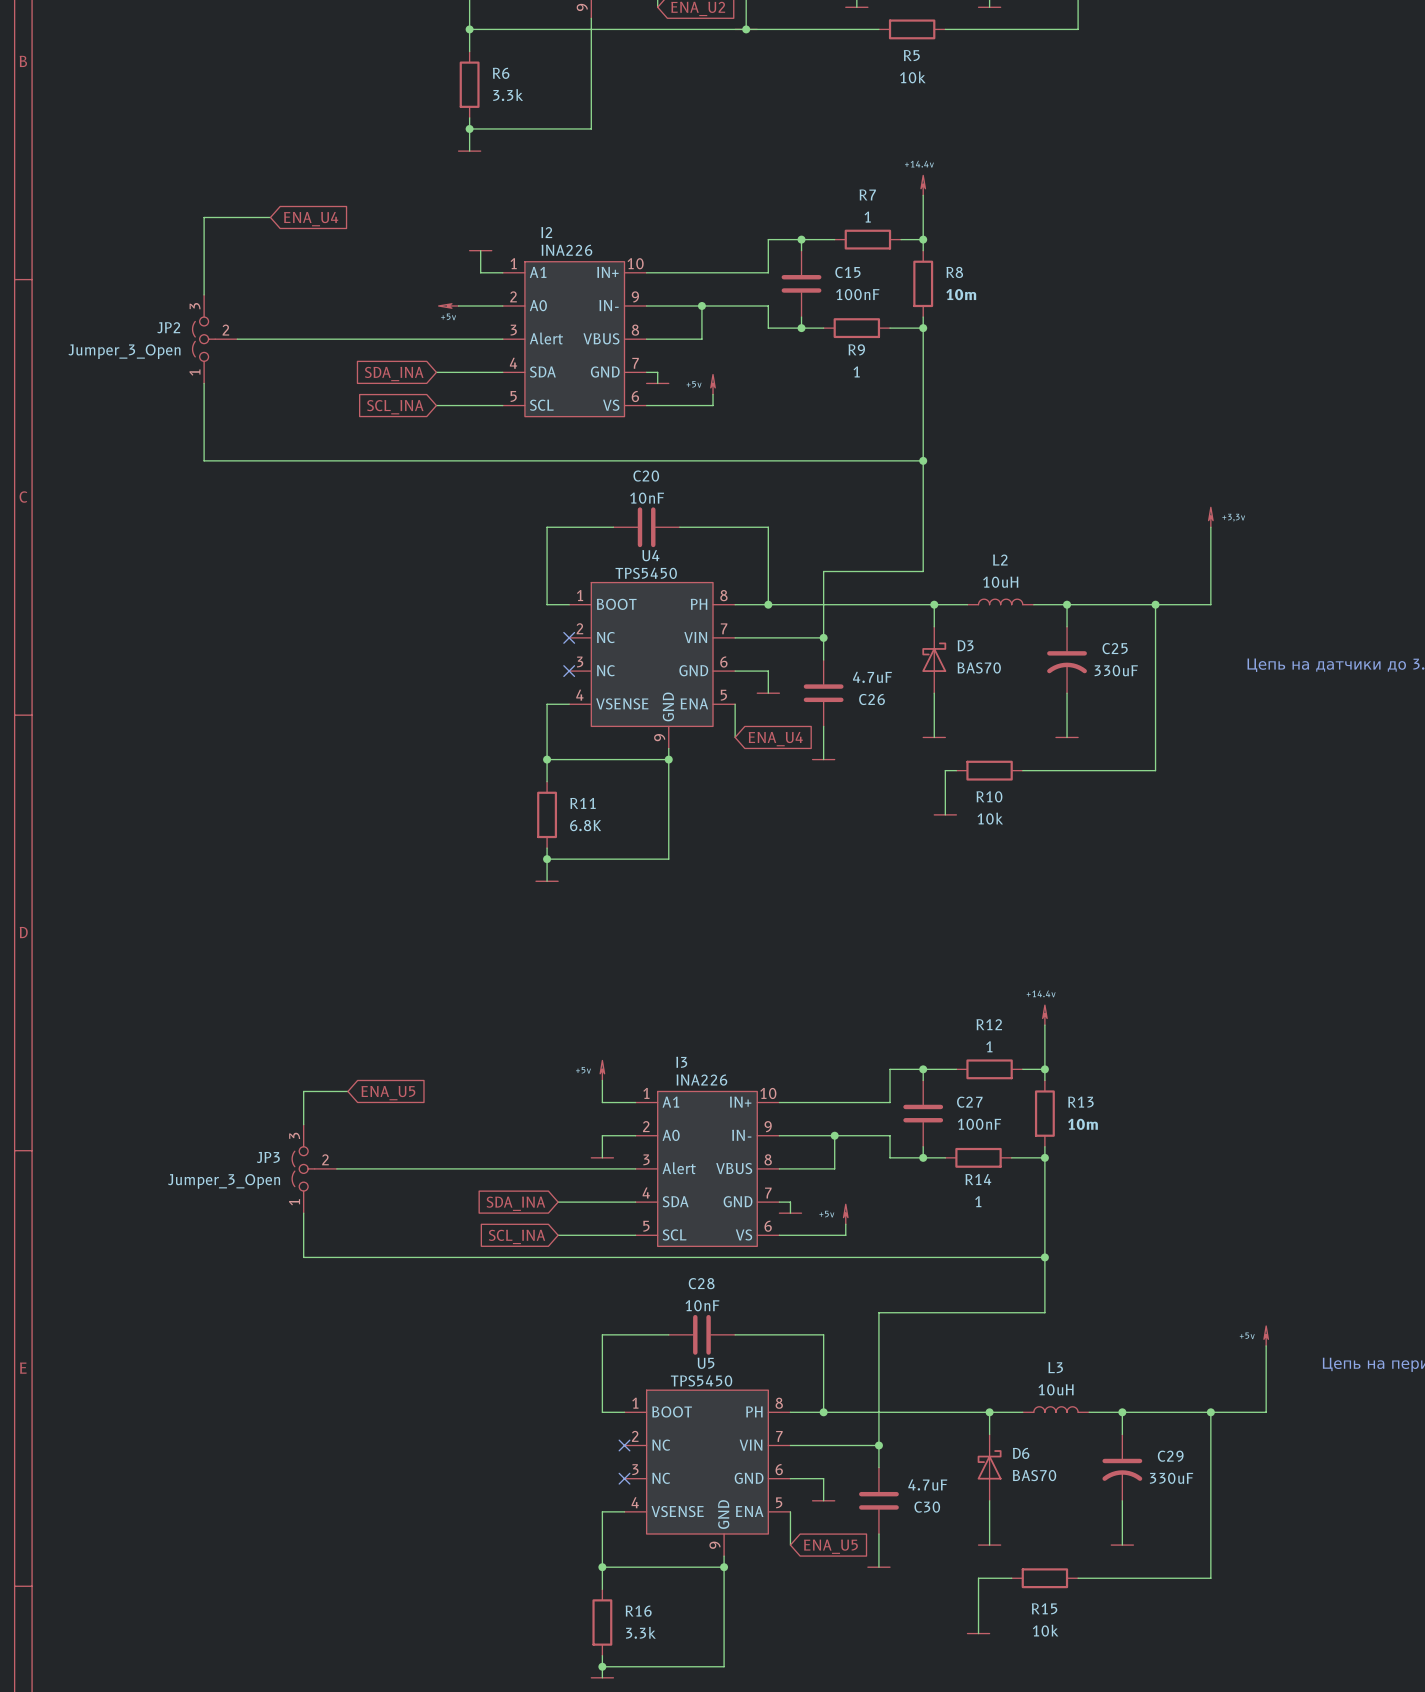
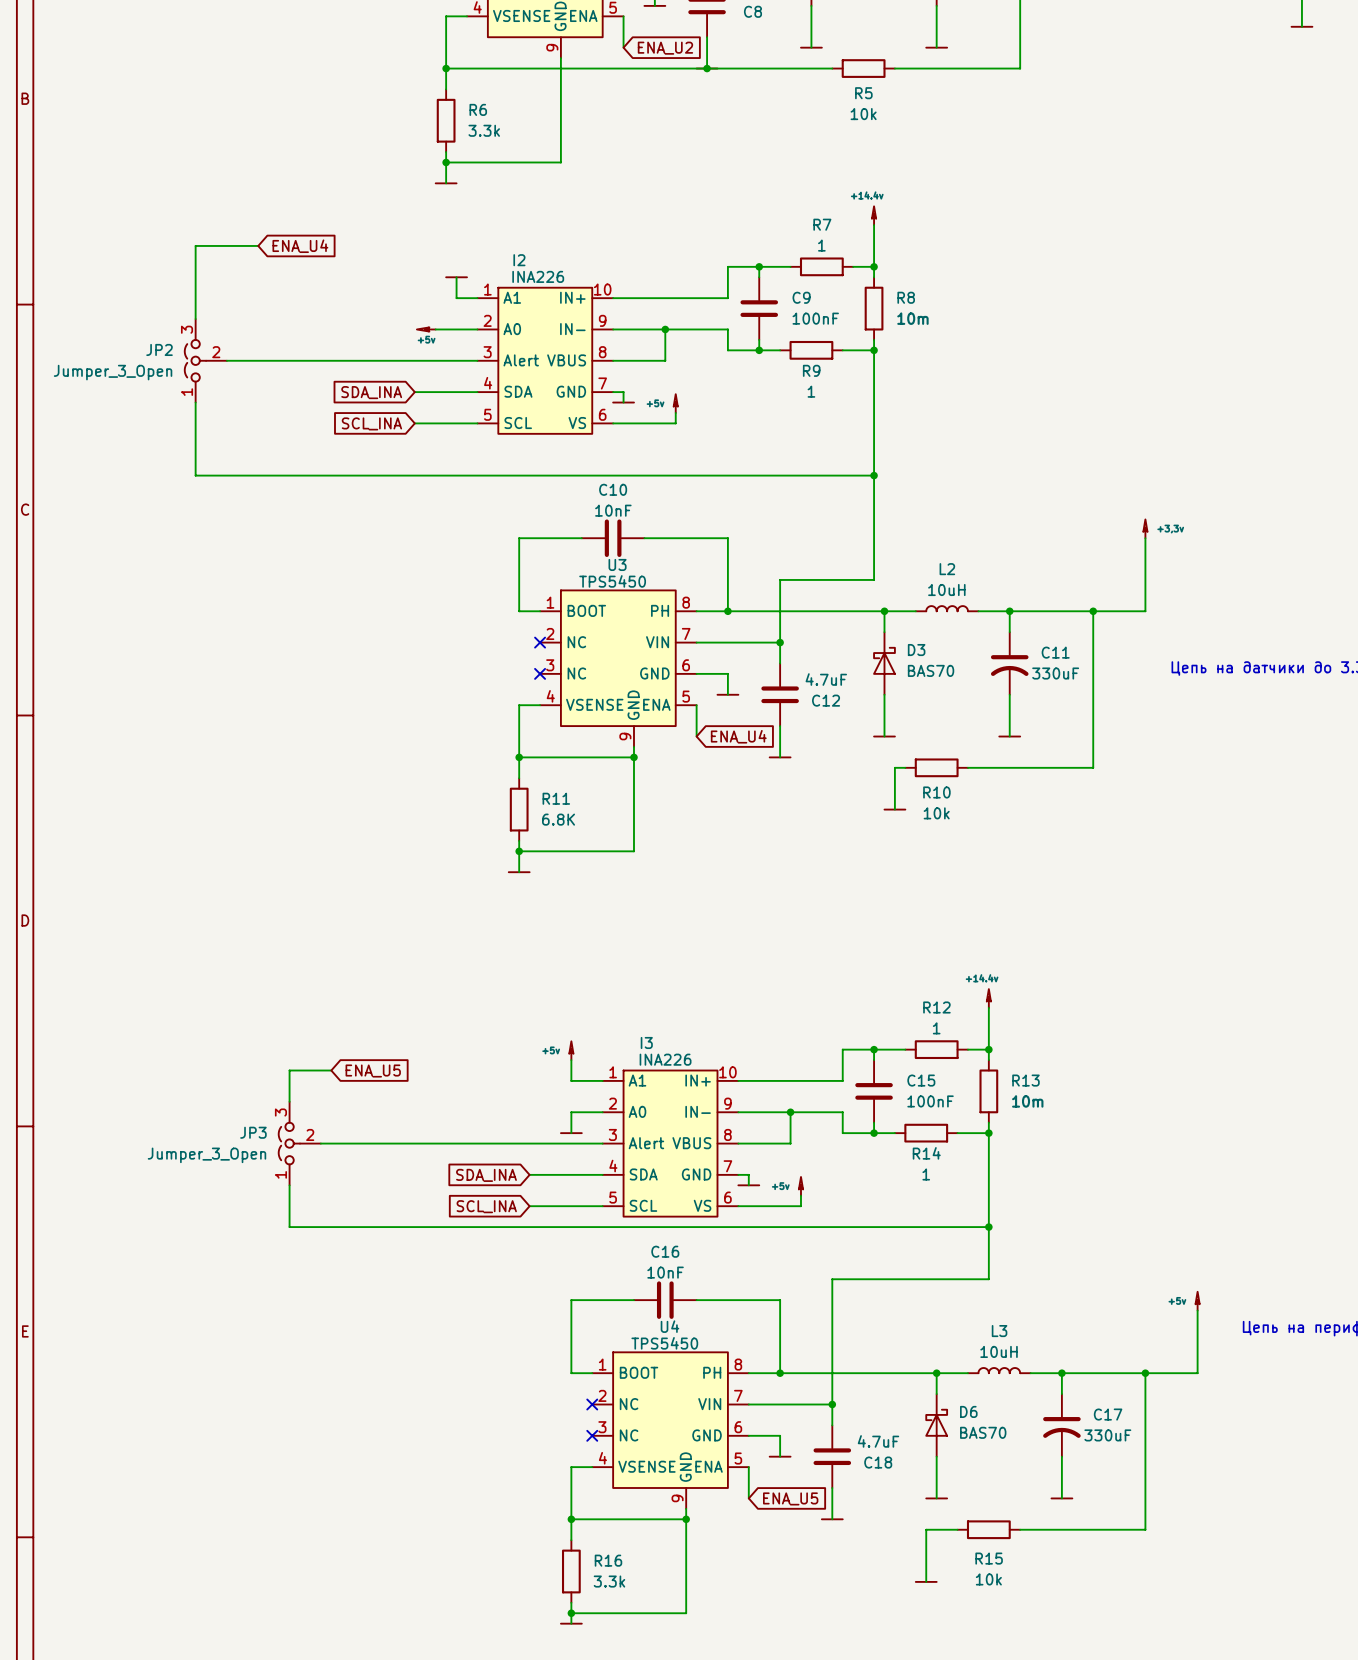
C15 name: C15 (847, 272) -> C9 (801, 297)
C20 name: C20 (646, 476) -> C10 (613, 489)
U4 name: U4 (650, 555) -> U3 (617, 564)
C25 name: C25 (1115, 648) -> C11 (1055, 652)
C26 name: C26 (872, 699) -> C12 (826, 700)
C27 name: C27 (969, 1102) -> C15 (921, 1080)
C28 name: C28 (701, 1283) -> C16 (665, 1251)
U5 name: U5 (706, 1363) -> U4 (669, 1326)
C29 name: C29 (1170, 1456) -> C17 (1108, 1414)
C30 name: C30 (927, 1507) -> C18 (878, 1462)

